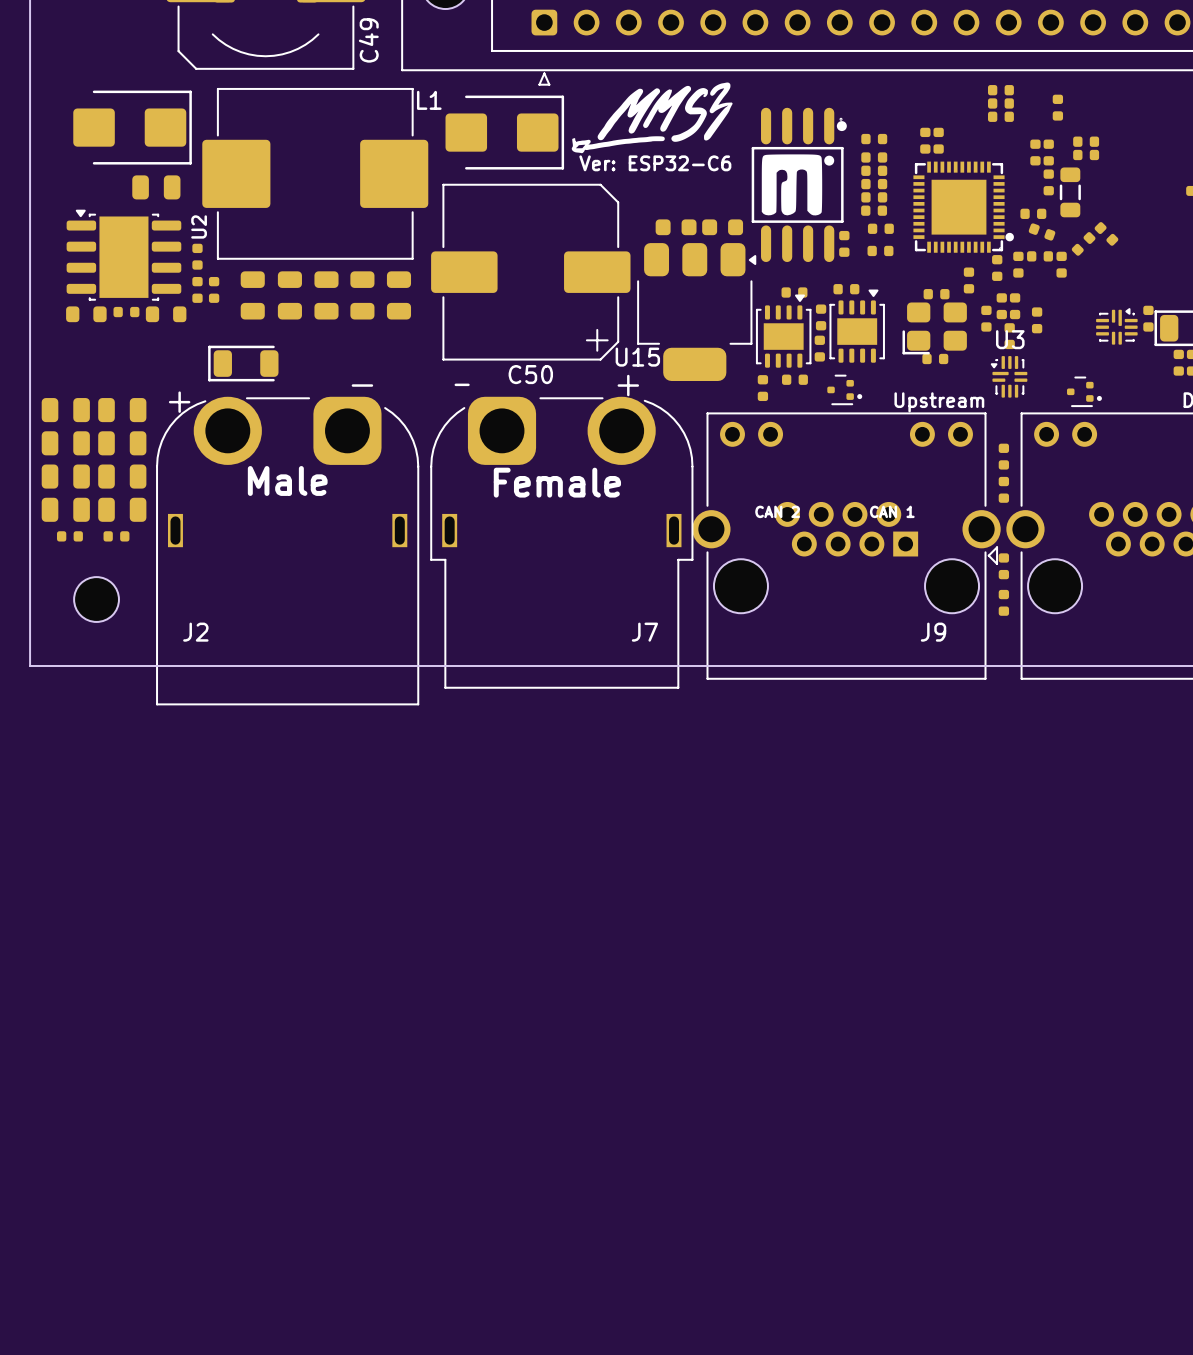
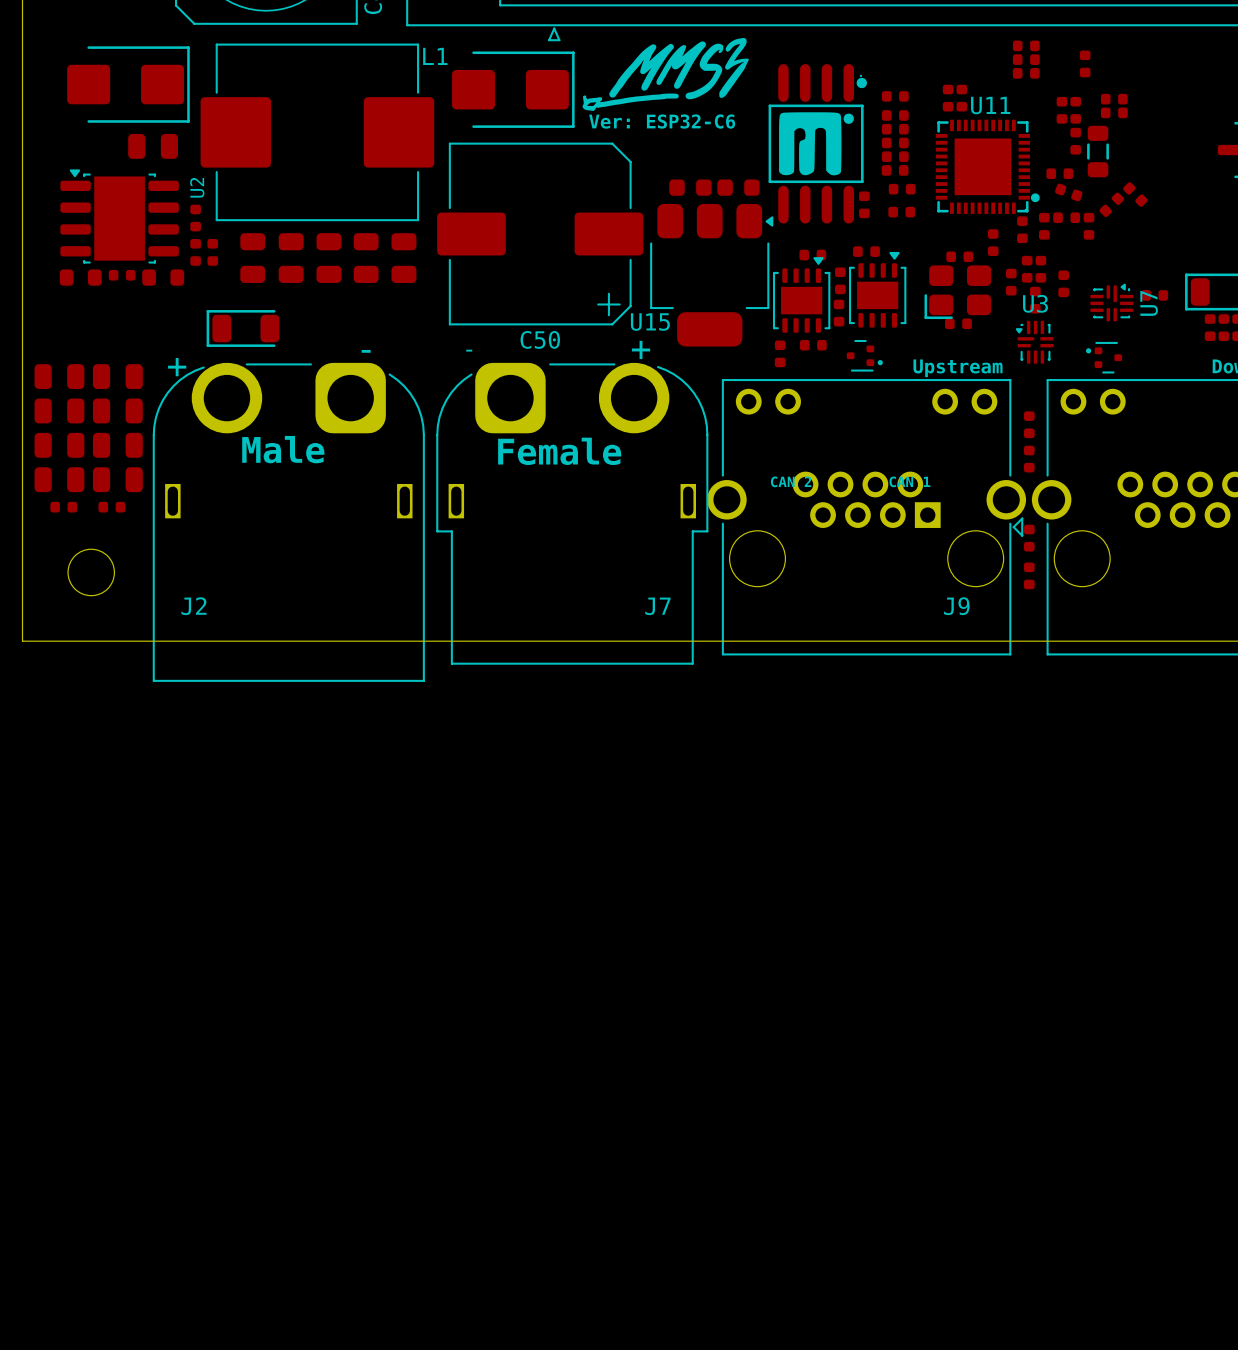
U11 name: none -> U11 (990, 105)
part footprint: [1096, 308, 1138, 345] -> [1141, 290, 1169, 301]
part: (1148, 318) -> none
U7: none -> (1111, 302)
part rotation: 0° (1084, 391) -> 180° (1104, 357)

